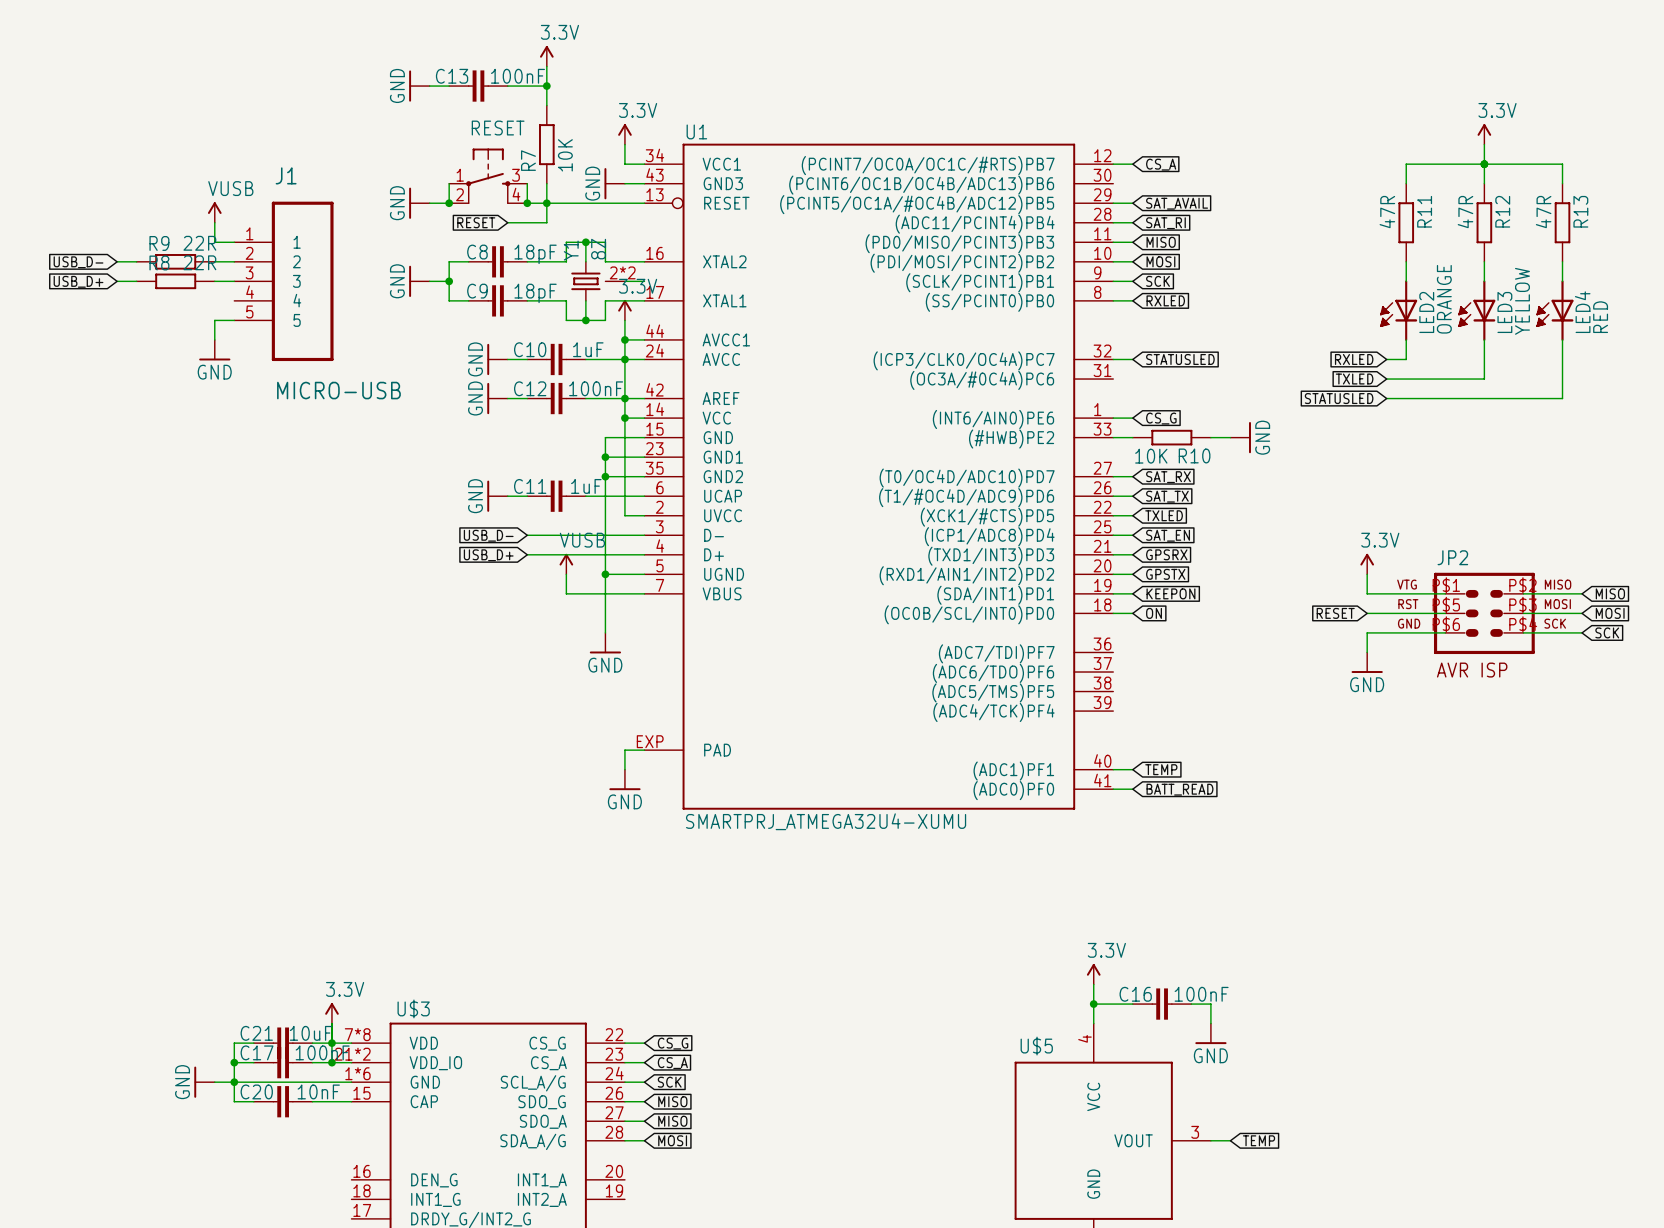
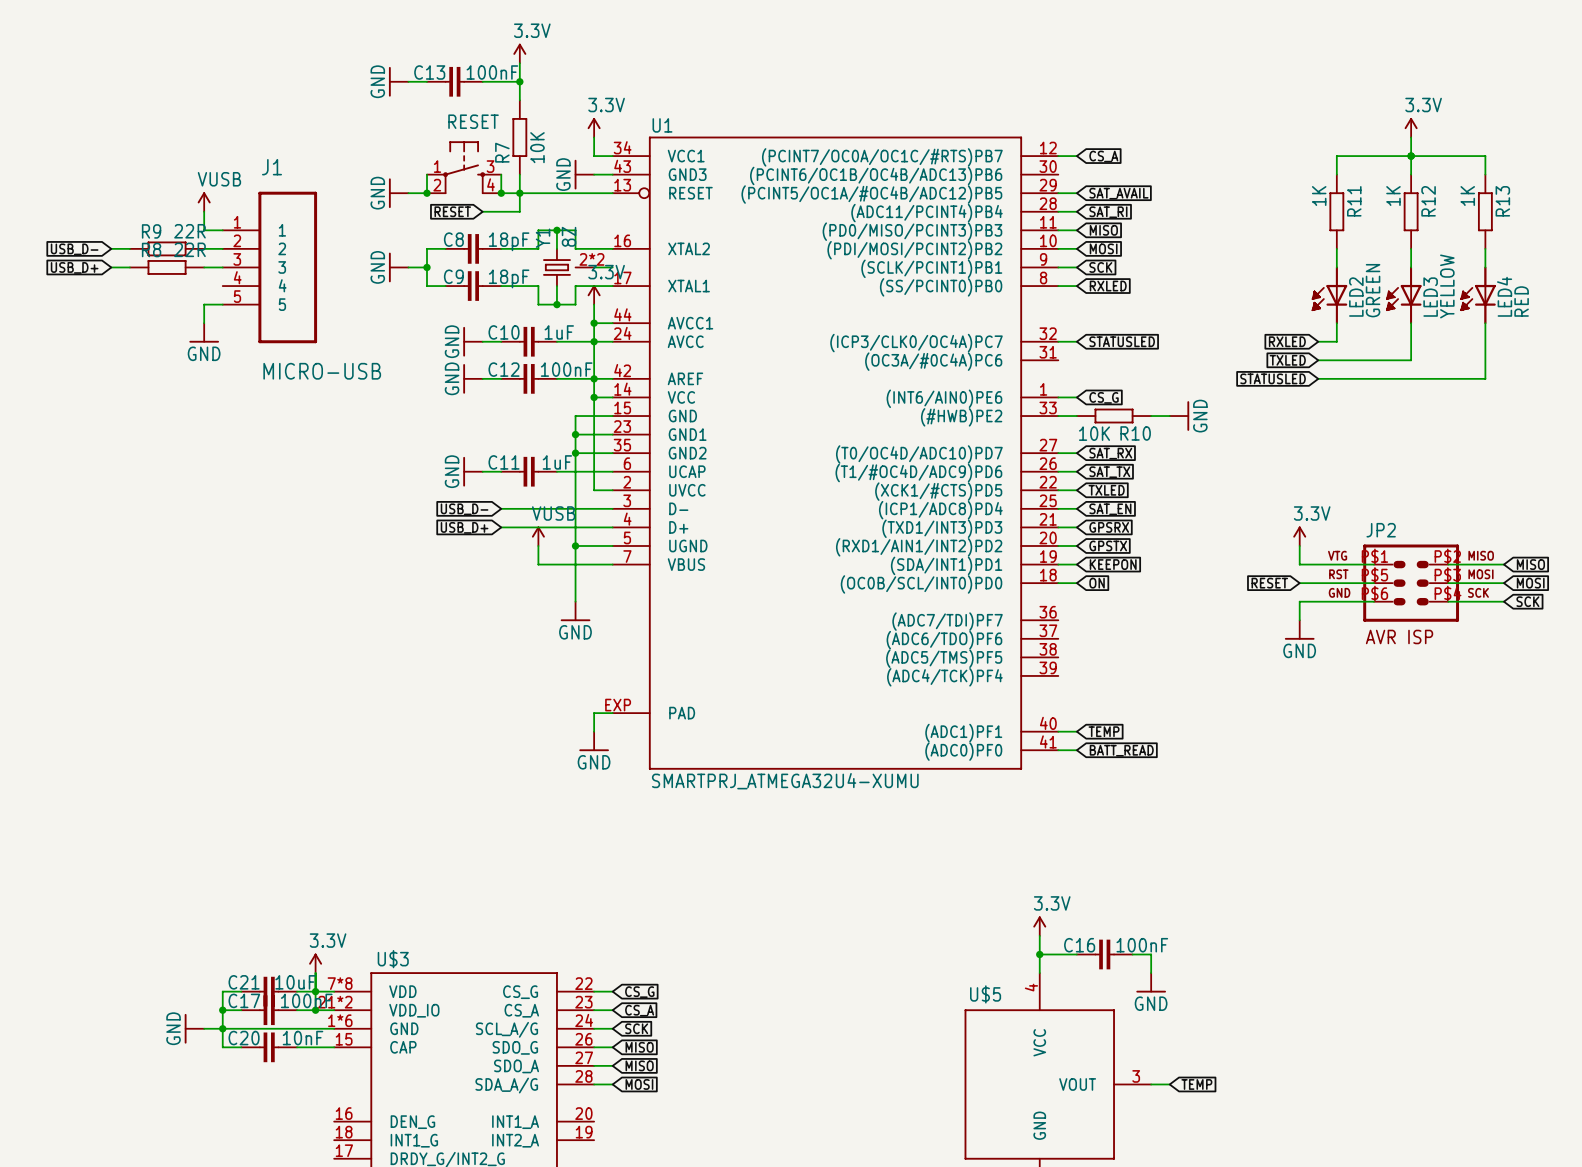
R11 value: 47R (1387, 212) -> 1K (1319, 196)
R12 value: 47R (1465, 212) -> 1K (1393, 196)
R13 value: 47R (1543, 212) -> 1K (1467, 196)
LED2 value: ORANGE (1444, 299) -> GREEN (1373, 290)

